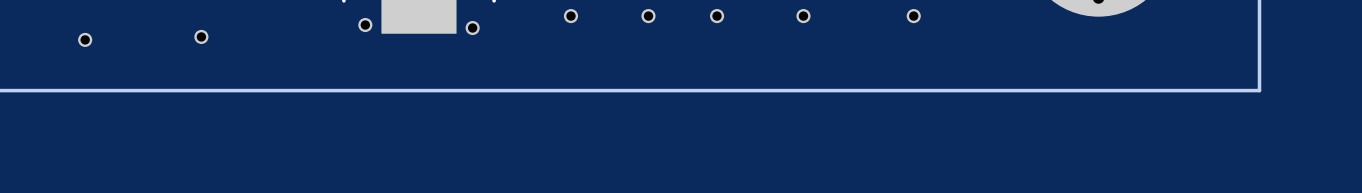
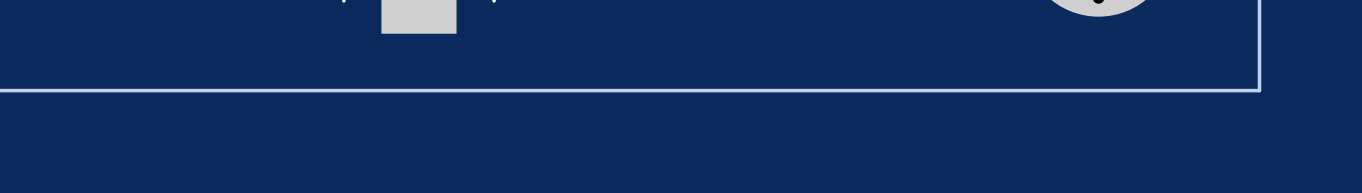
part: (570, 16) -> none
part: (648, 16) -> none
part: (717, 16) -> none
part: (803, 16) -> none
part: (913, 16) -> none
part: (365, 25) -> none
part: (472, 27) -> none
part: (201, 36) -> none
part: (85, 39) -> none

